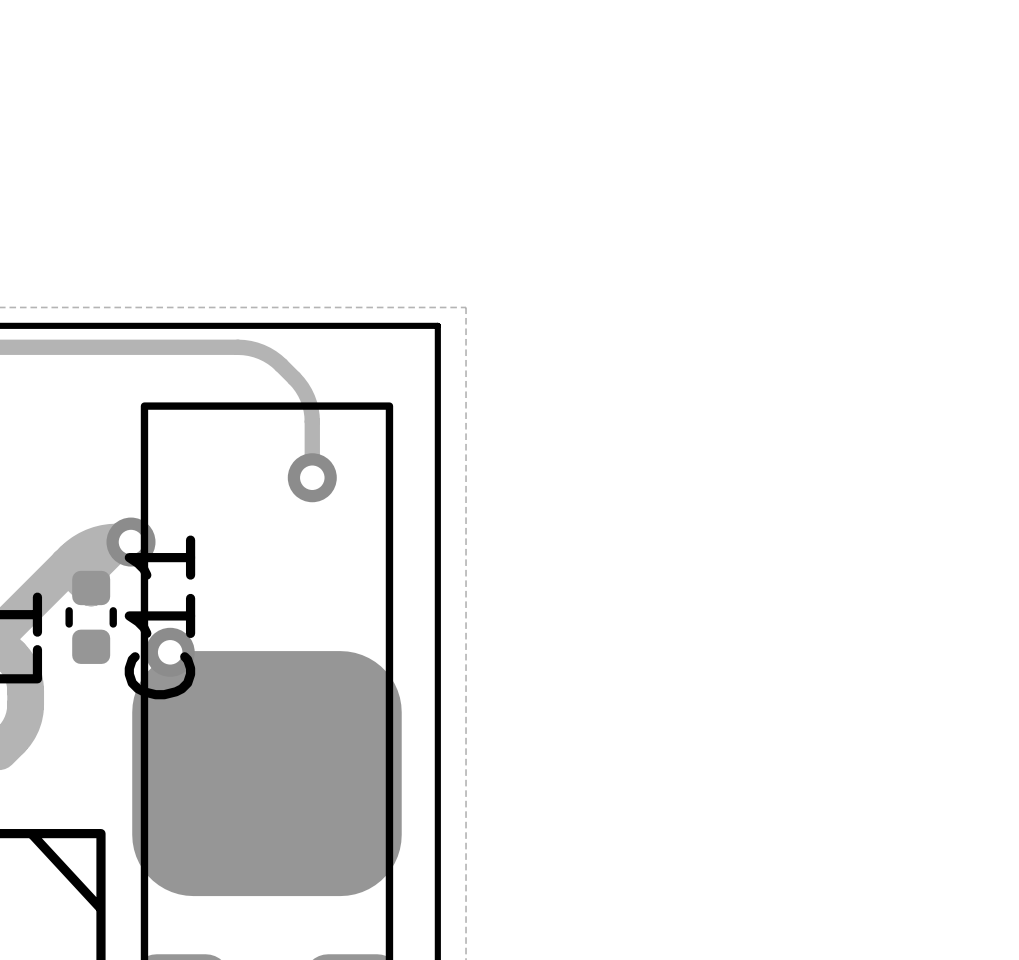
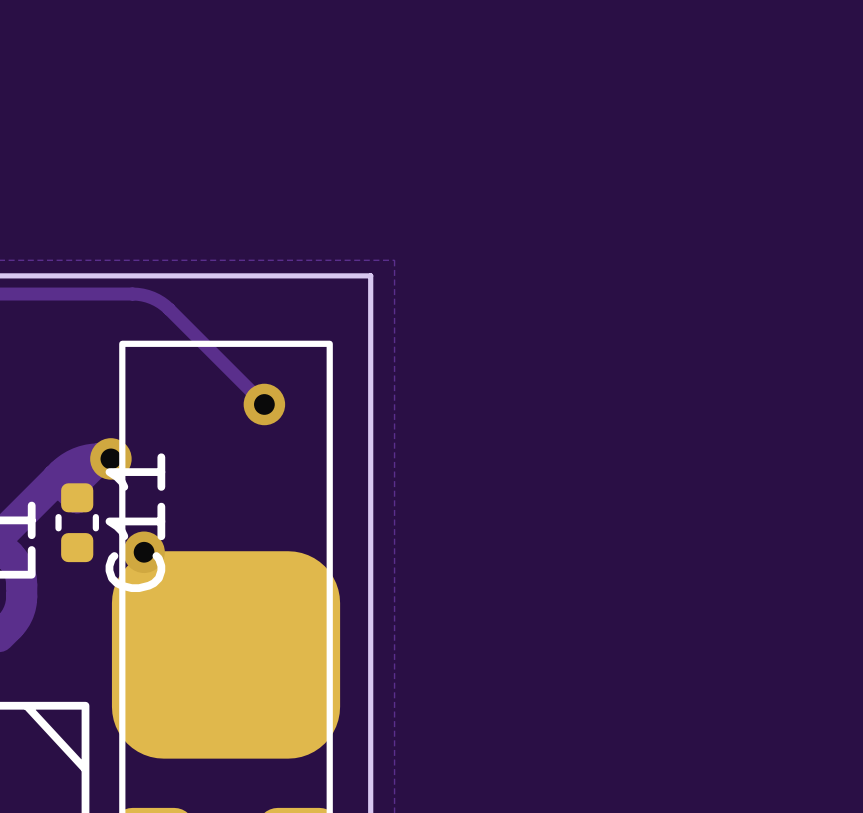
track: (156, 347) (243, 347) (261, 351) (276, 361) (298, 382) (309, 403) (312, 421) (312, 477) -> (132, 294) (152, 297) (165, 305) (264, 404)

